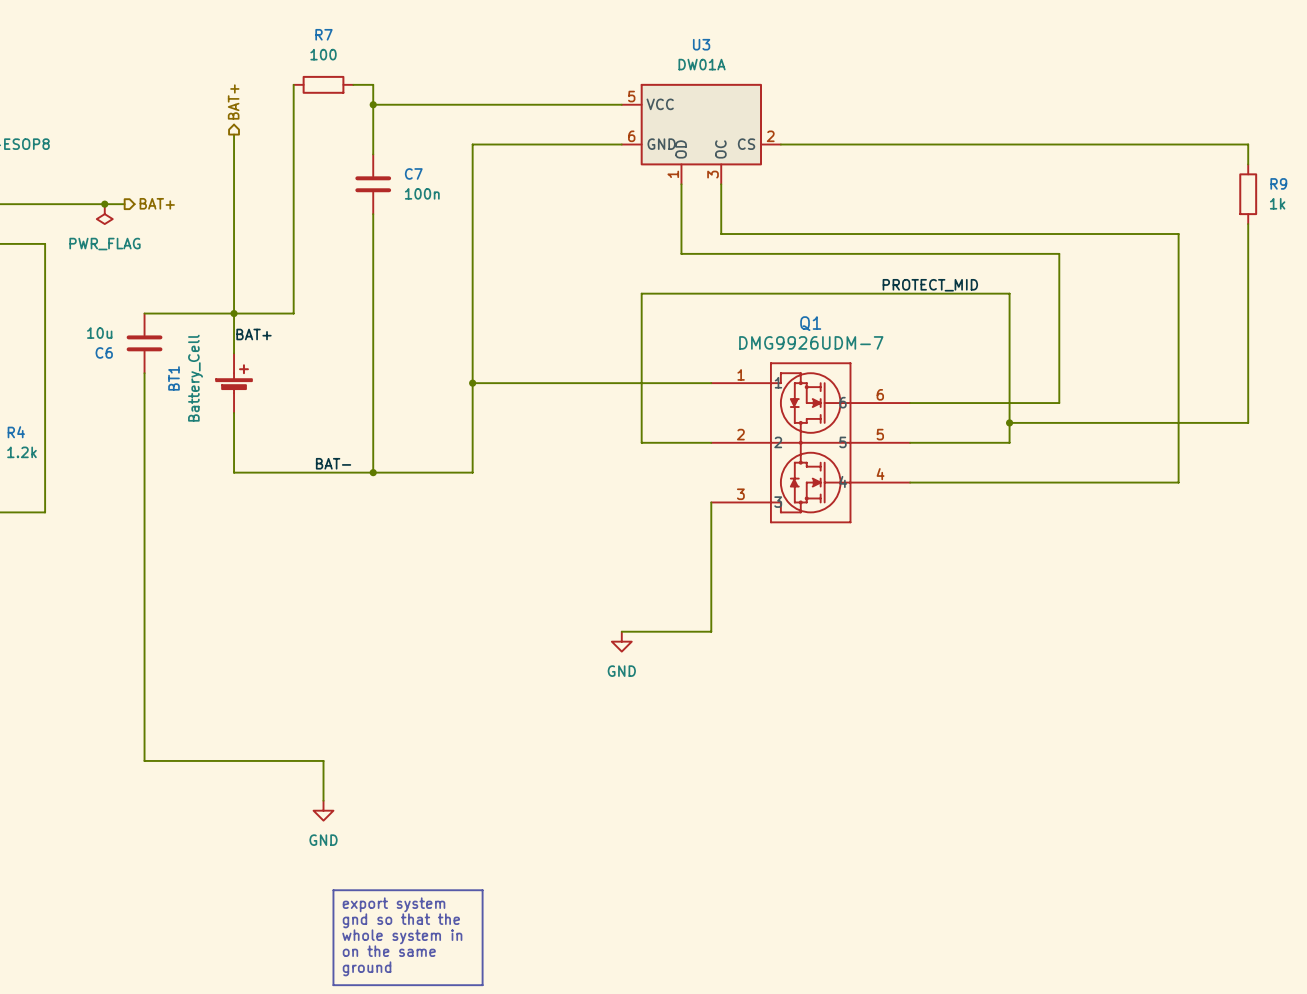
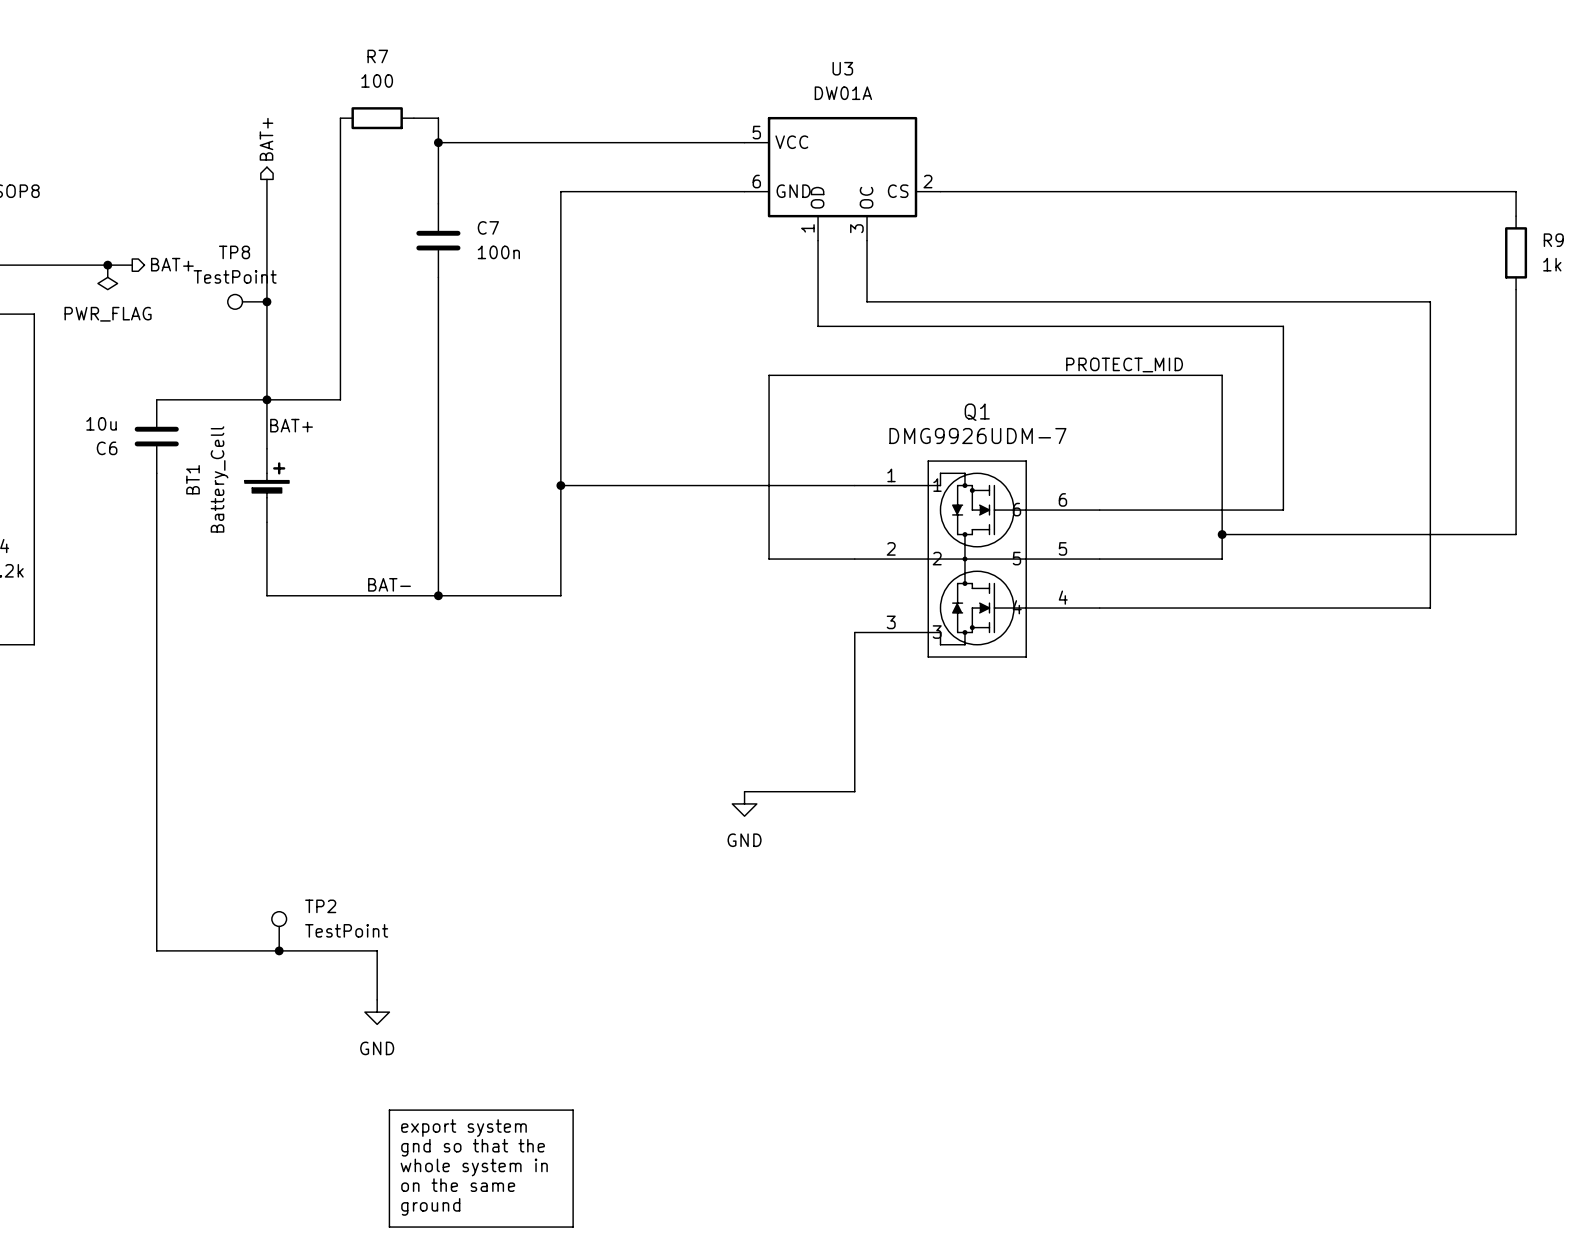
TP8: none -> TestPoint (247, 301)
junction: none -> (266, 301)
TP2: none -> TestPoint (279, 931)
junction: none -> (279, 950)

